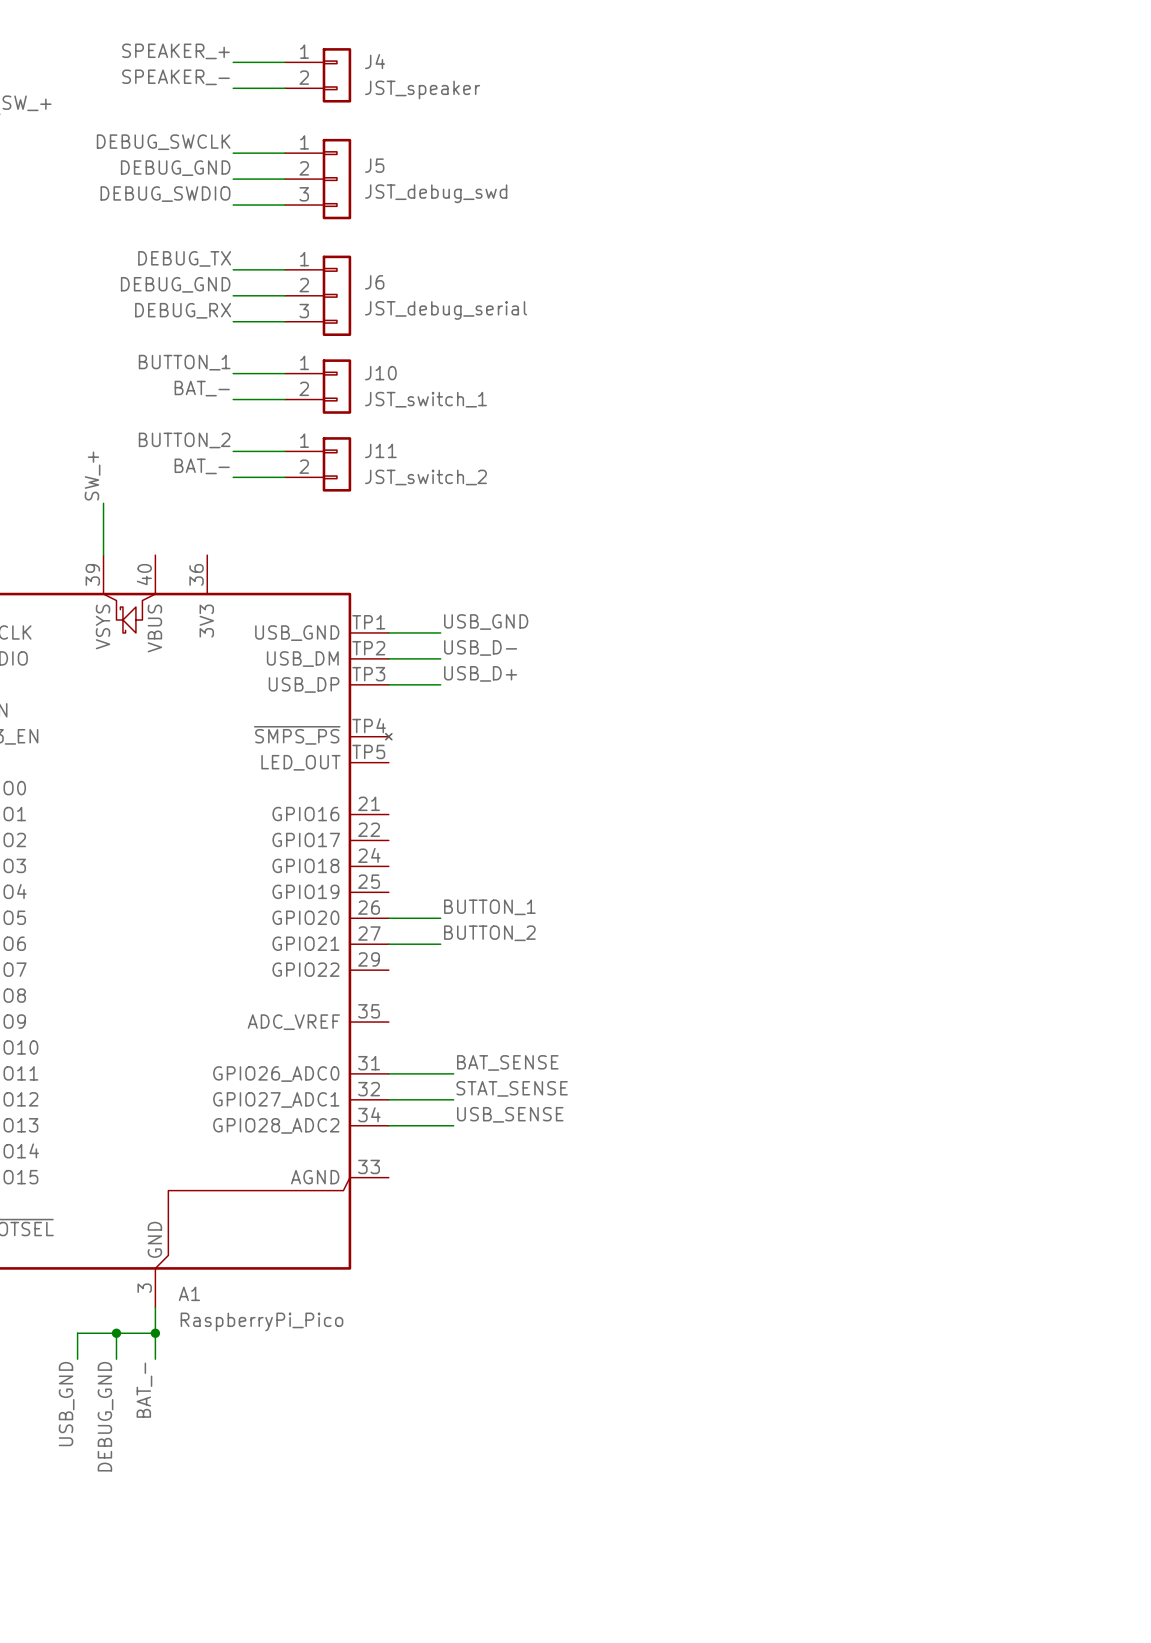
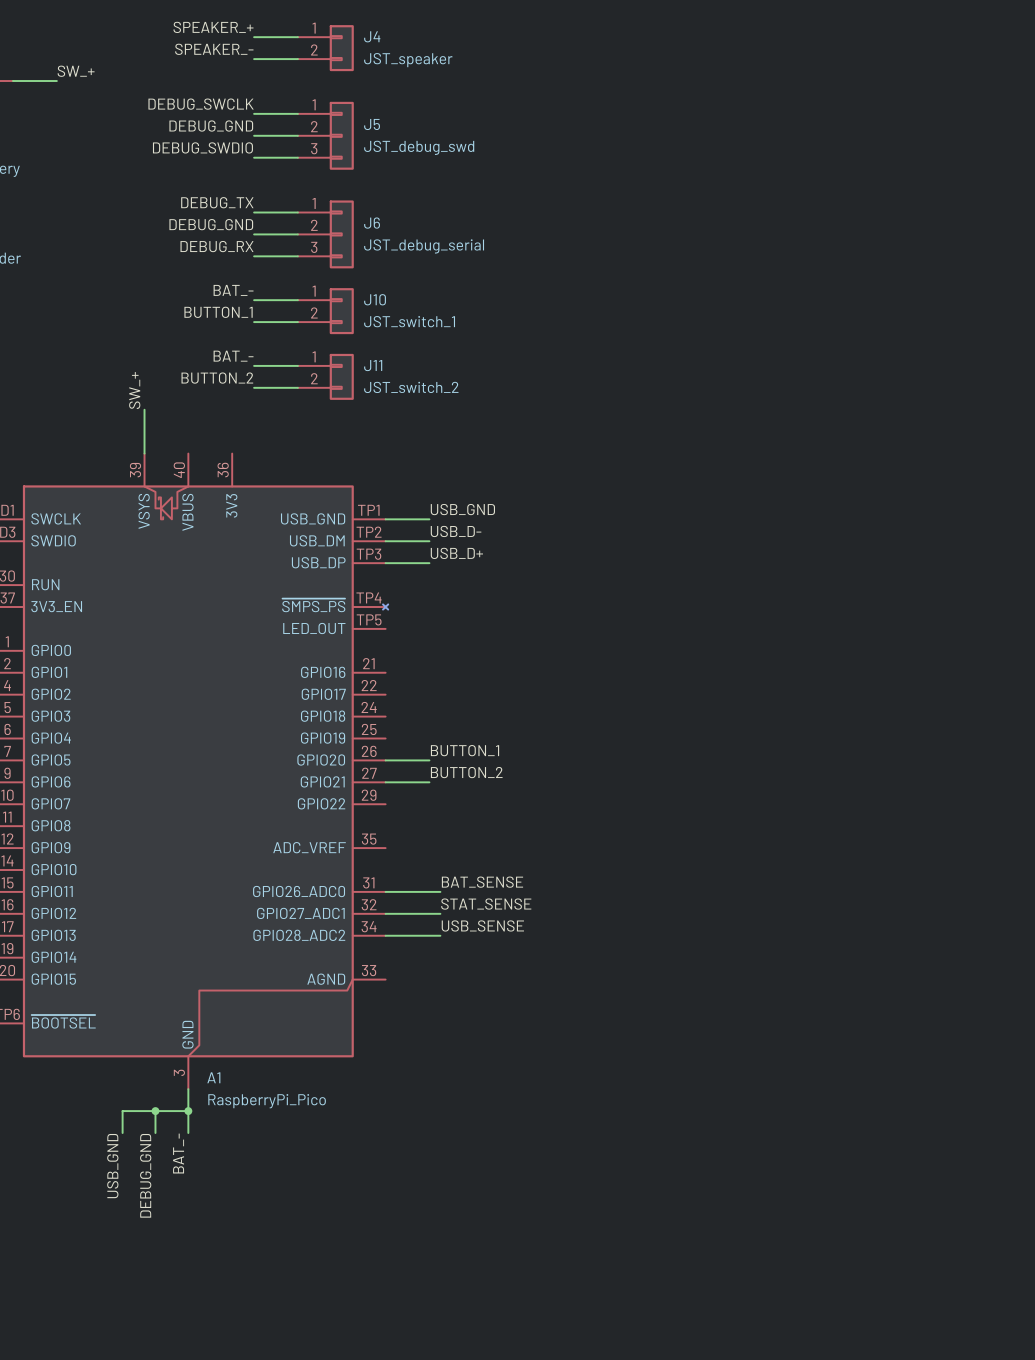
label: BUTTON_1 (184, 362) -> BAT_- (233, 290)
label: BAT_- (202, 388) -> BUTTON_1 (218, 312)
label: BUTTON_2 (184, 440) -> BAT_- (233, 356)
label: BAT_- (202, 466) -> BUTTON_2 (217, 378)

